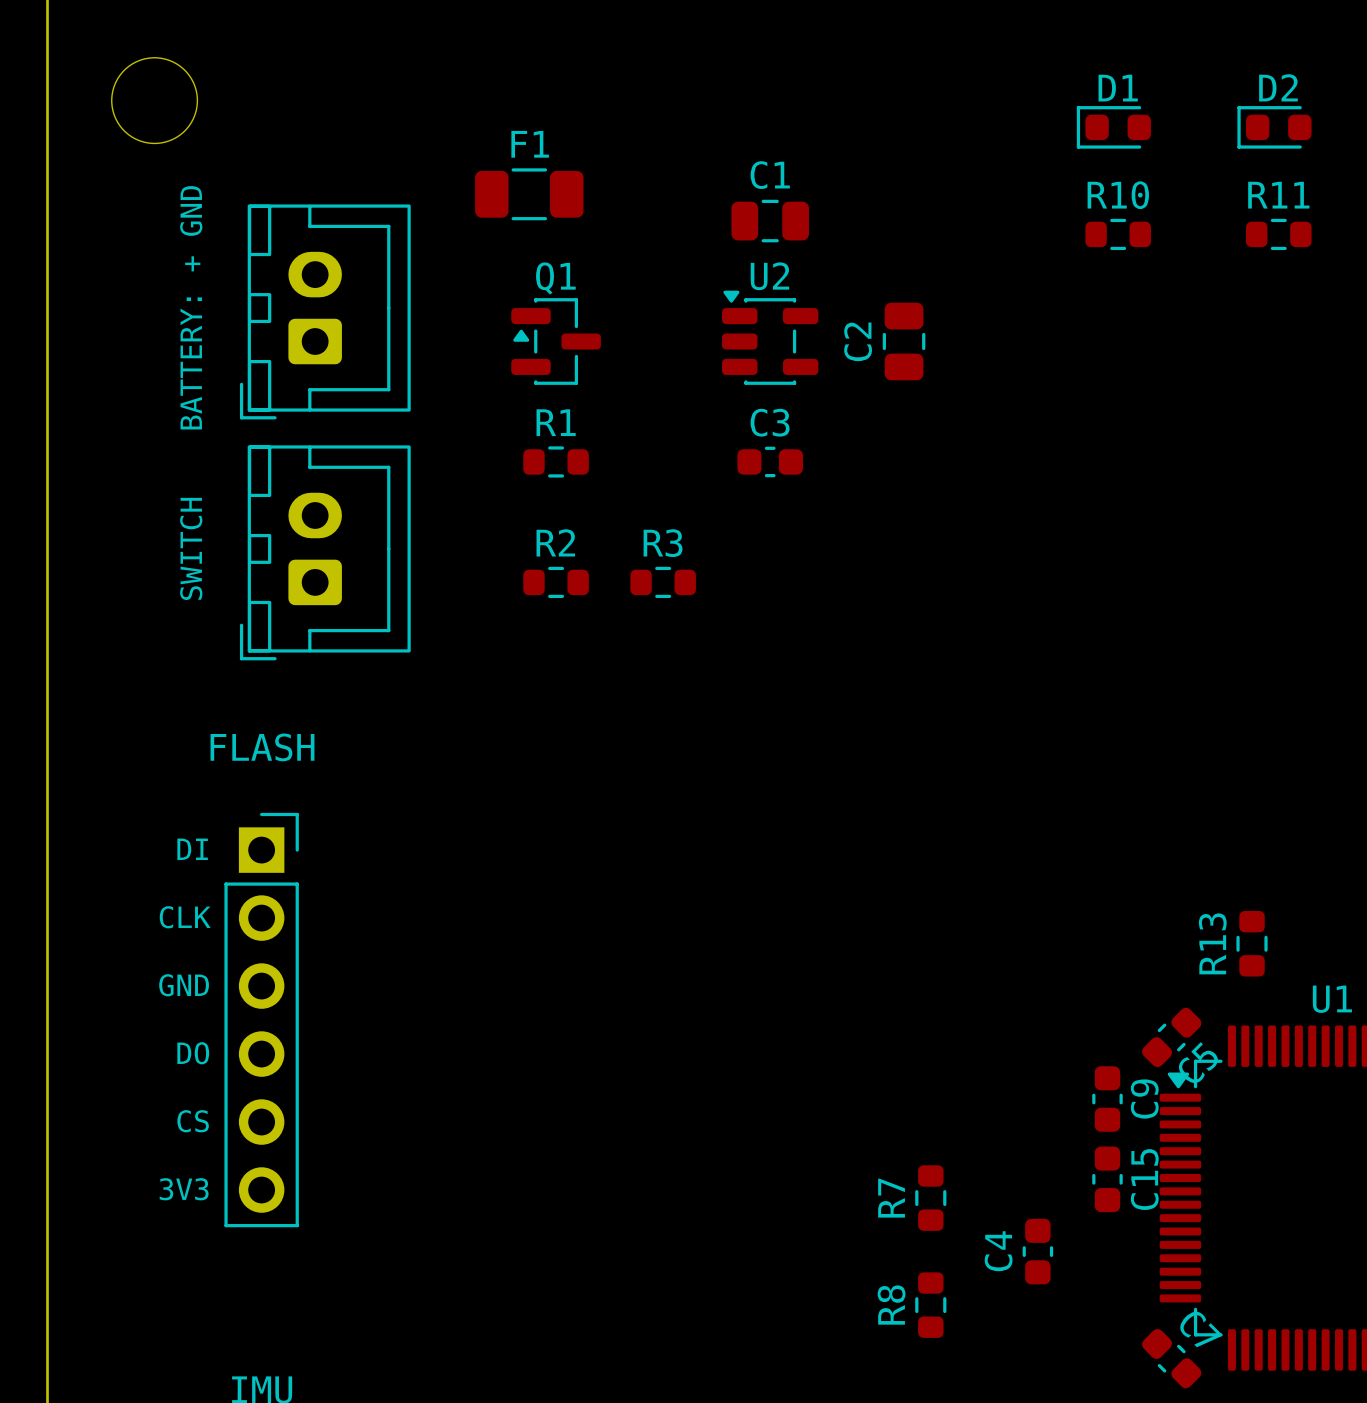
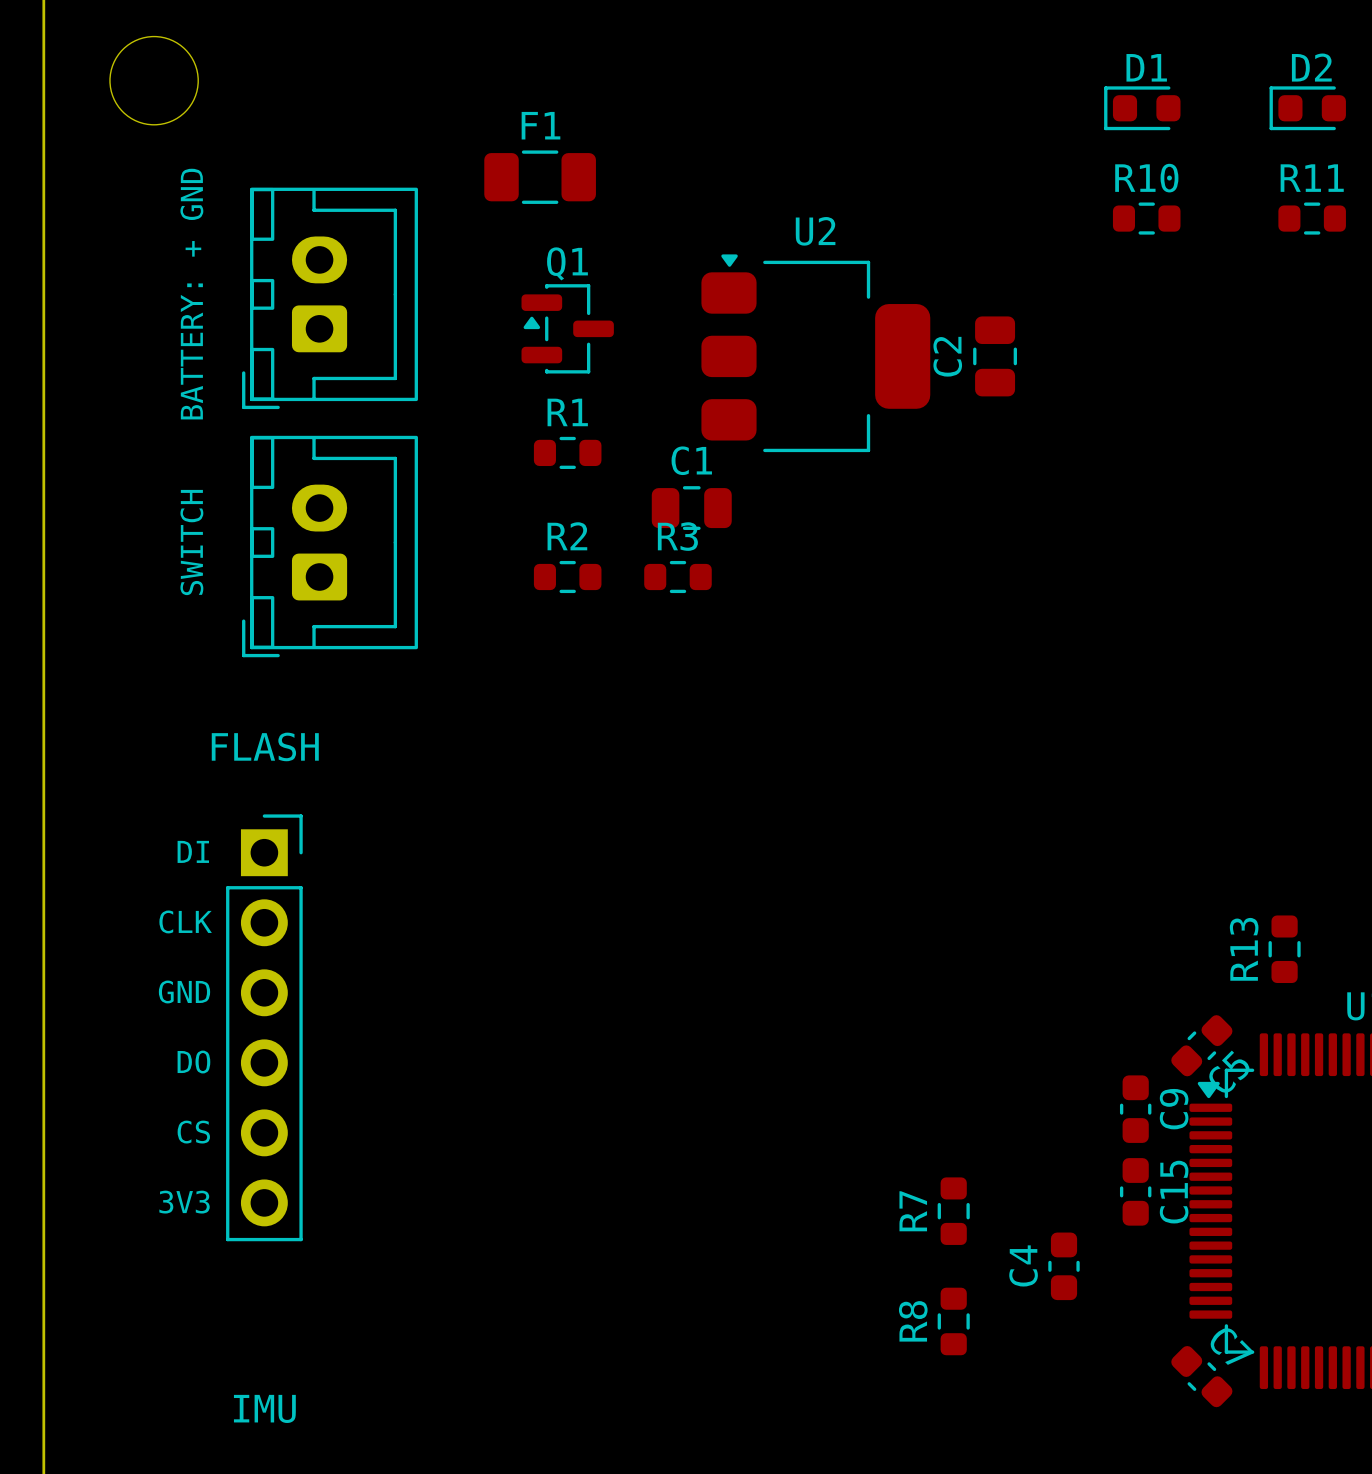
C1 position: (770, 221) -> (691, 508)
U2 name position: U2 (769, 276) -> U2 (815, 231)
U2 footprint: [722, 290, 819, 385] -> [701, 254, 931, 453]
C2 position: (904, 341) -> (995, 356)
C3: (770, 461) -> none

